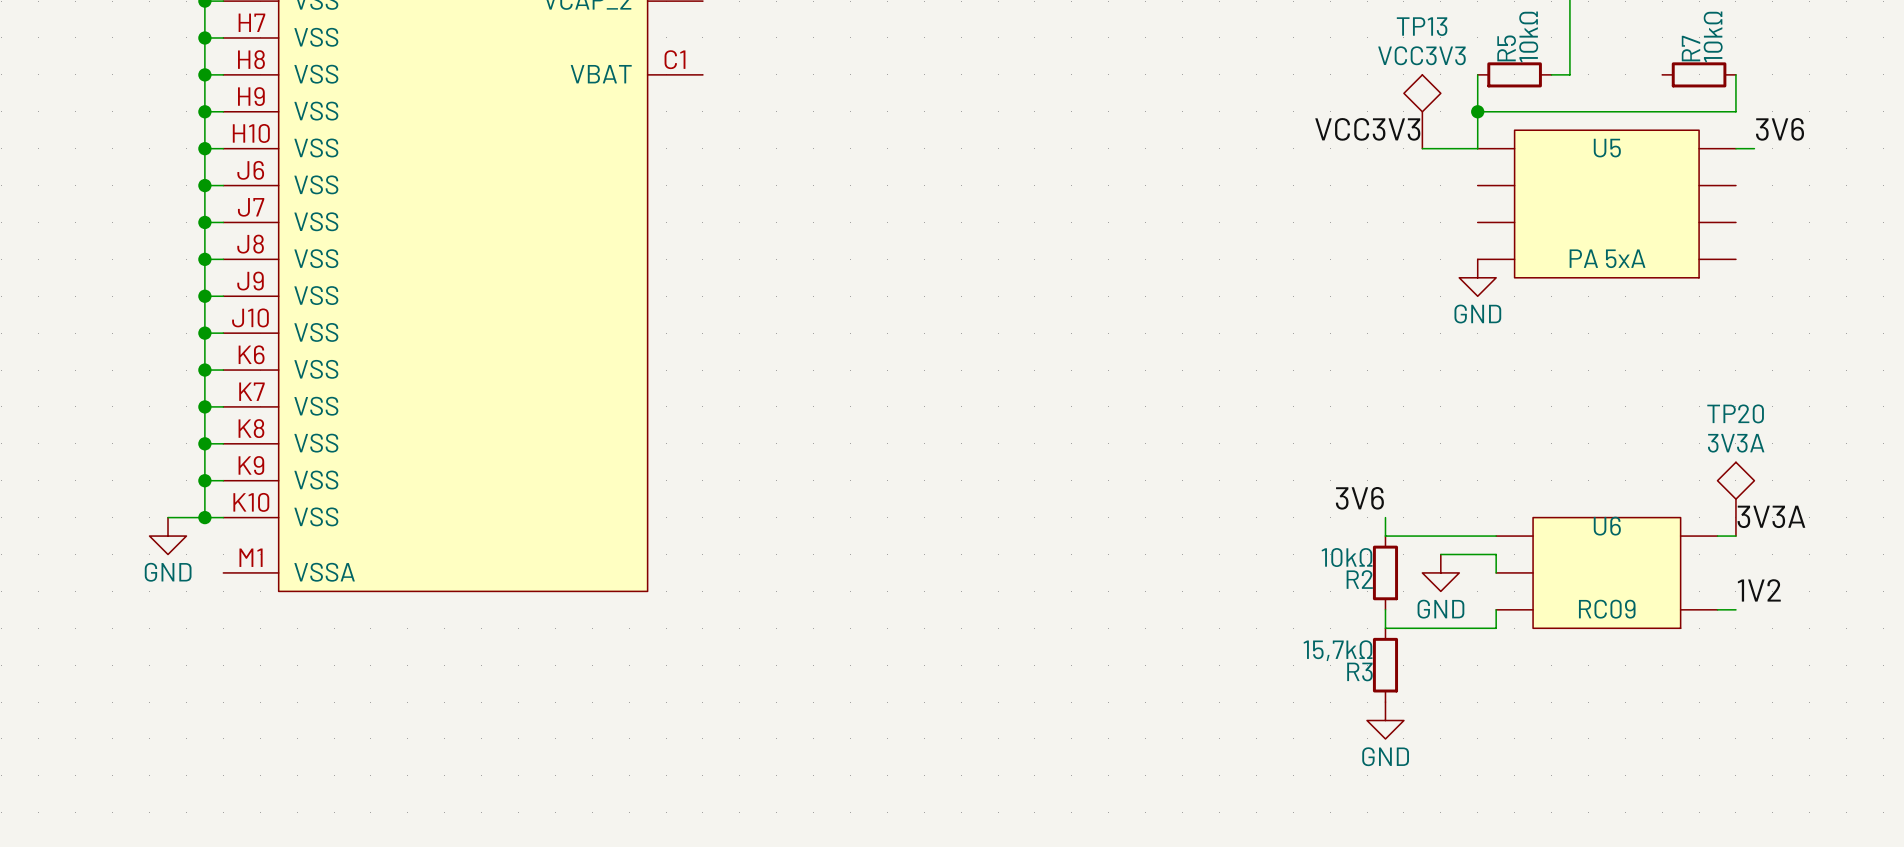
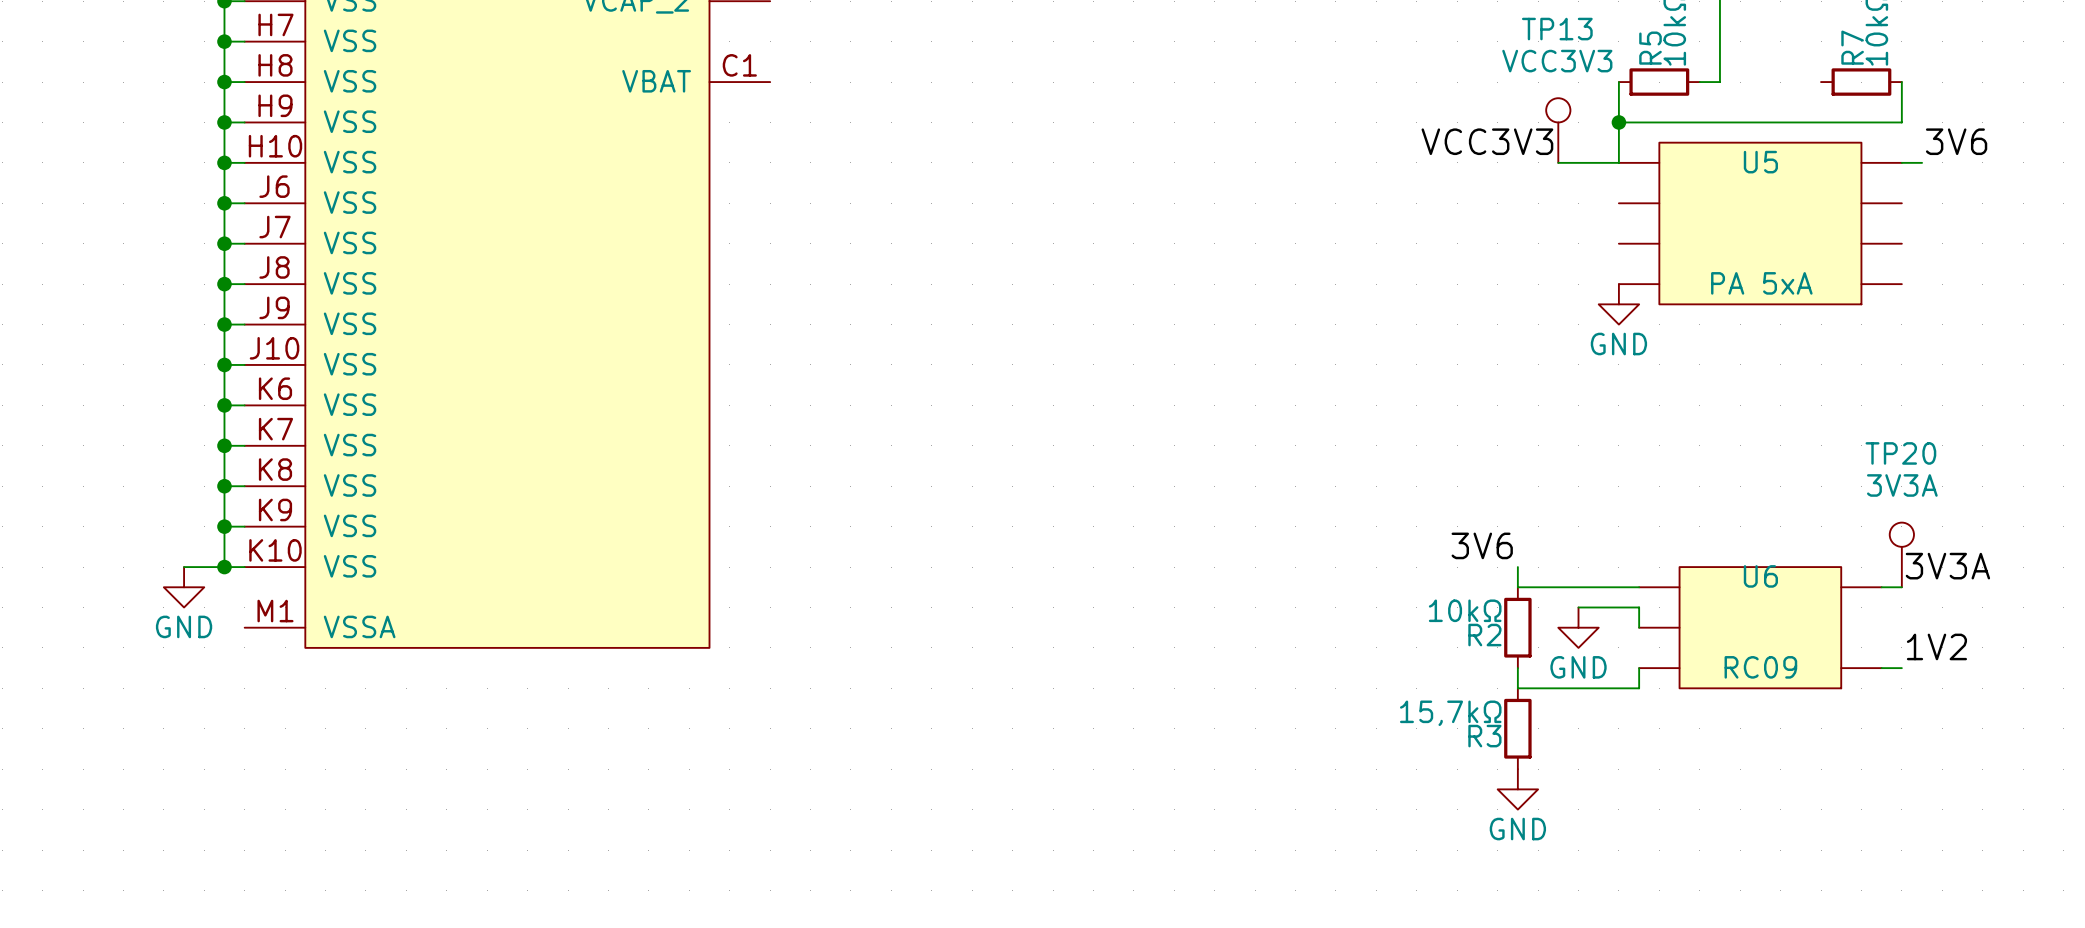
TP13 symbol: [1403, 74, 1441, 149] -> [1546, 98, 1571, 163]
TP20 symbol: [1717, 462, 1755, 537] -> [1889, 522, 1914, 588]

